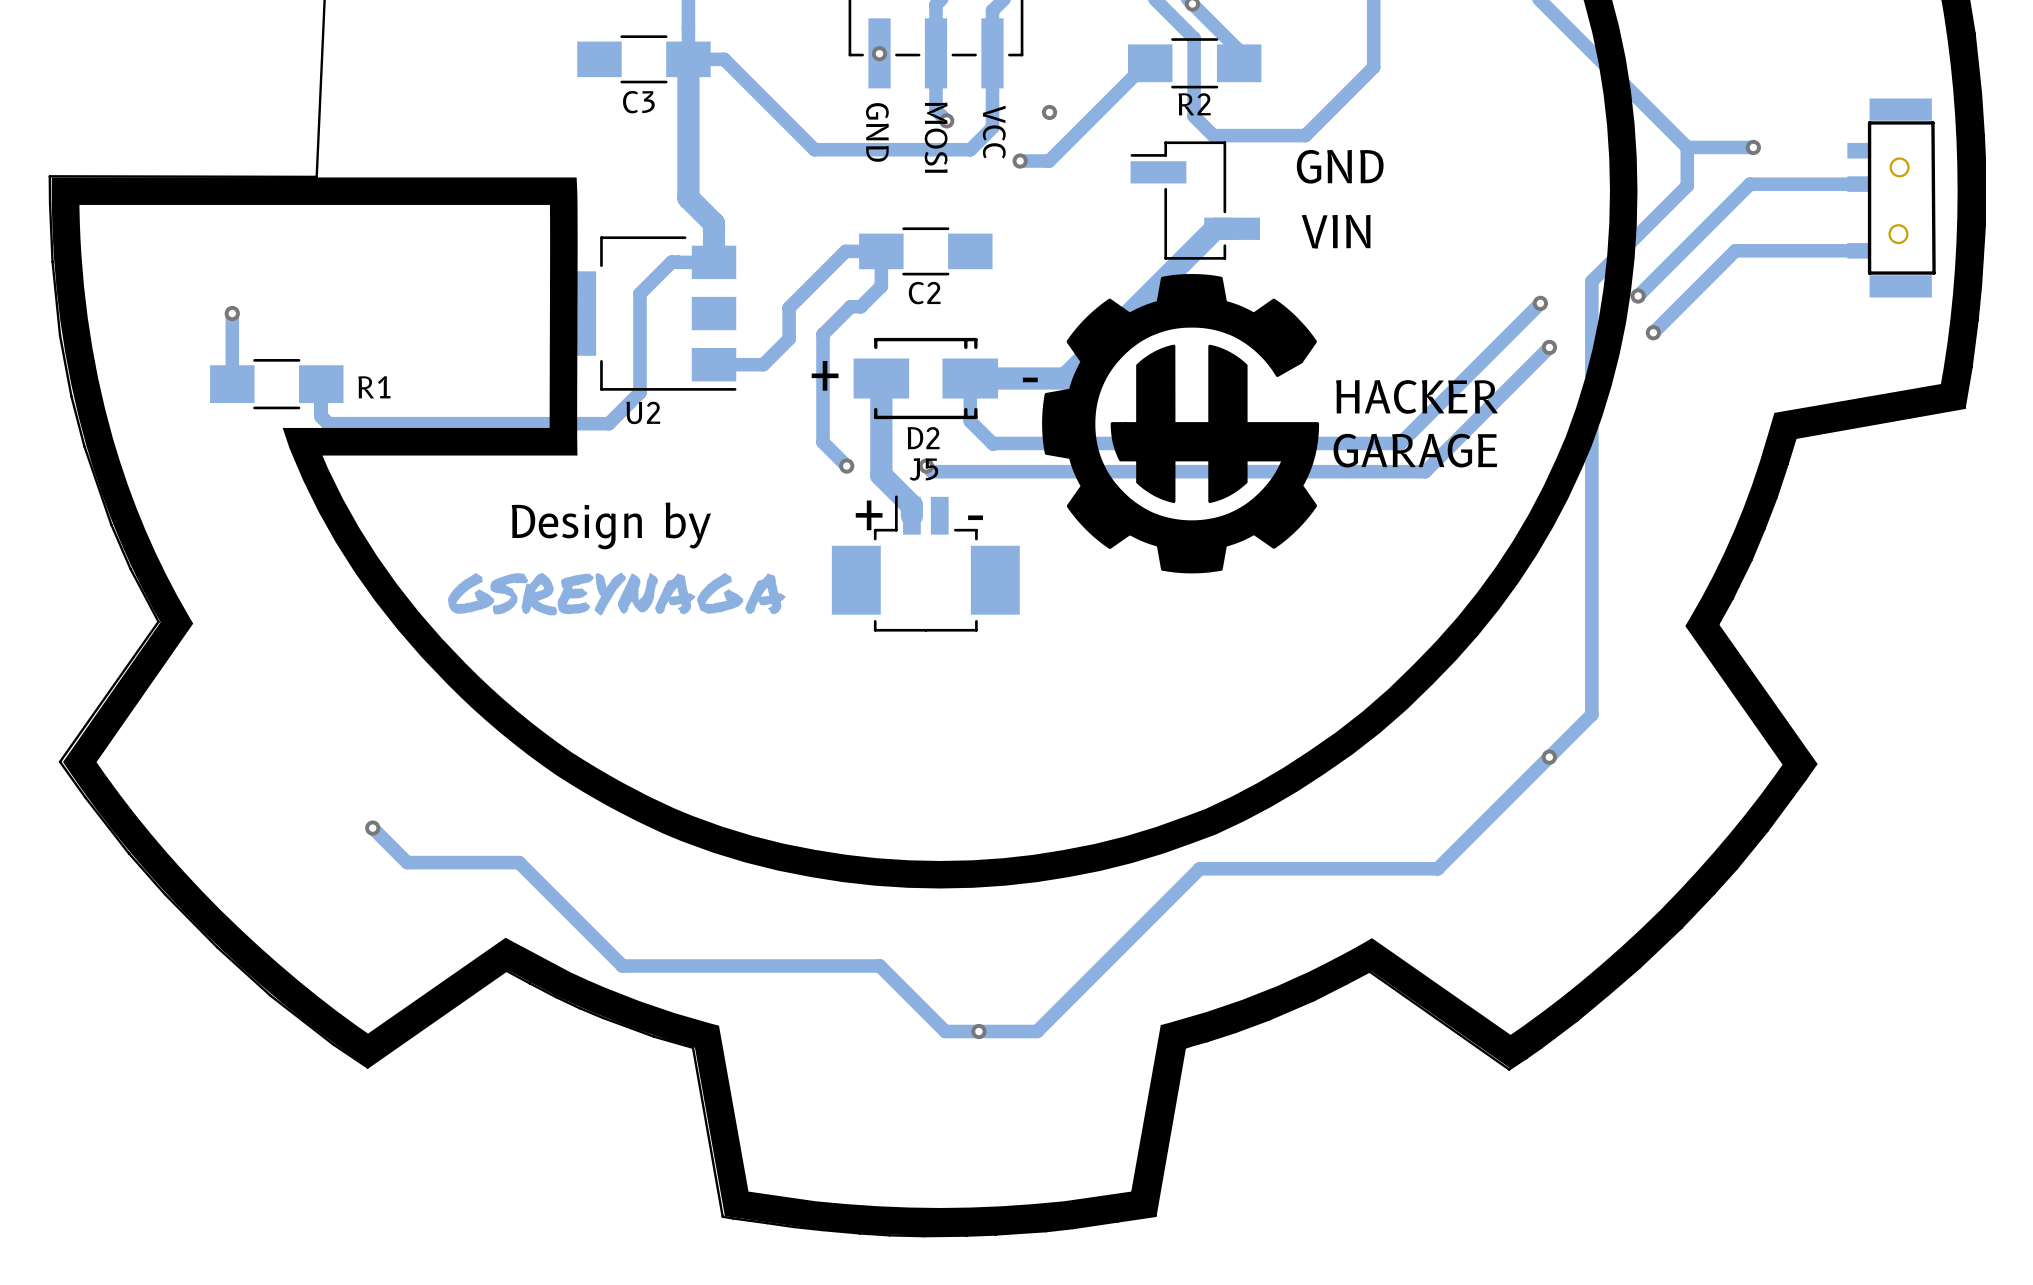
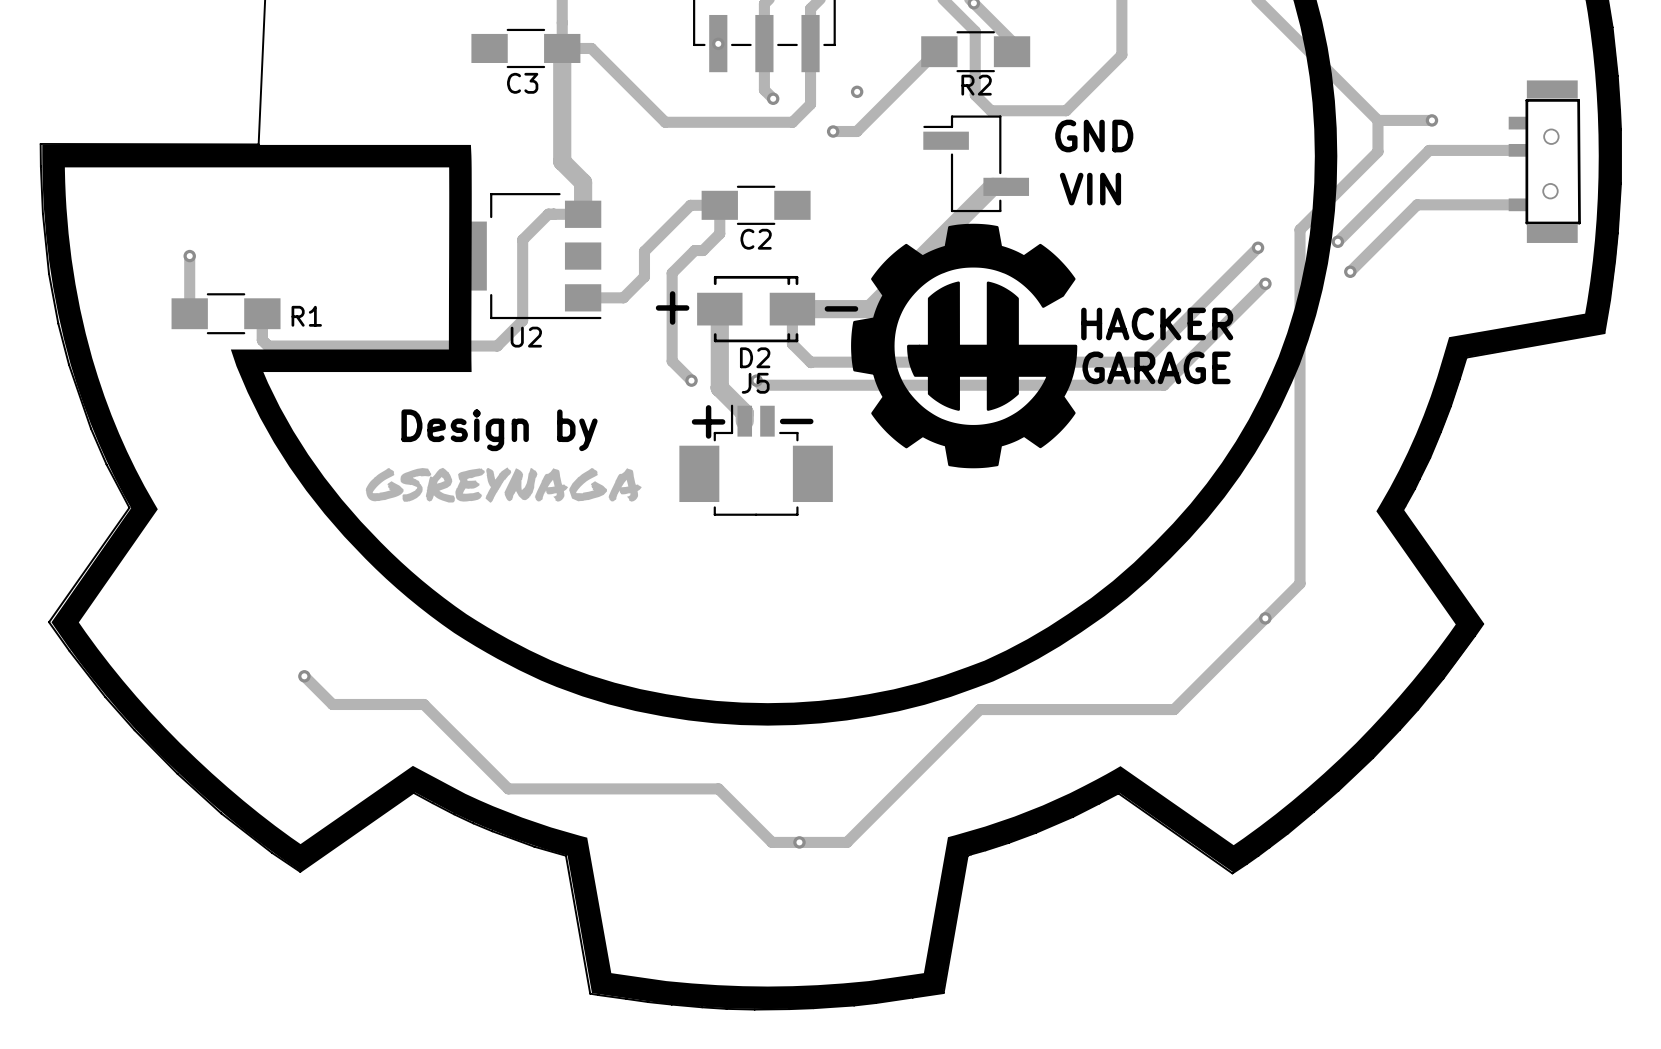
text: GND (877, 132) -> none
text: VCC (994, 132) -> none
text: MOSI (936, 137) -> none

